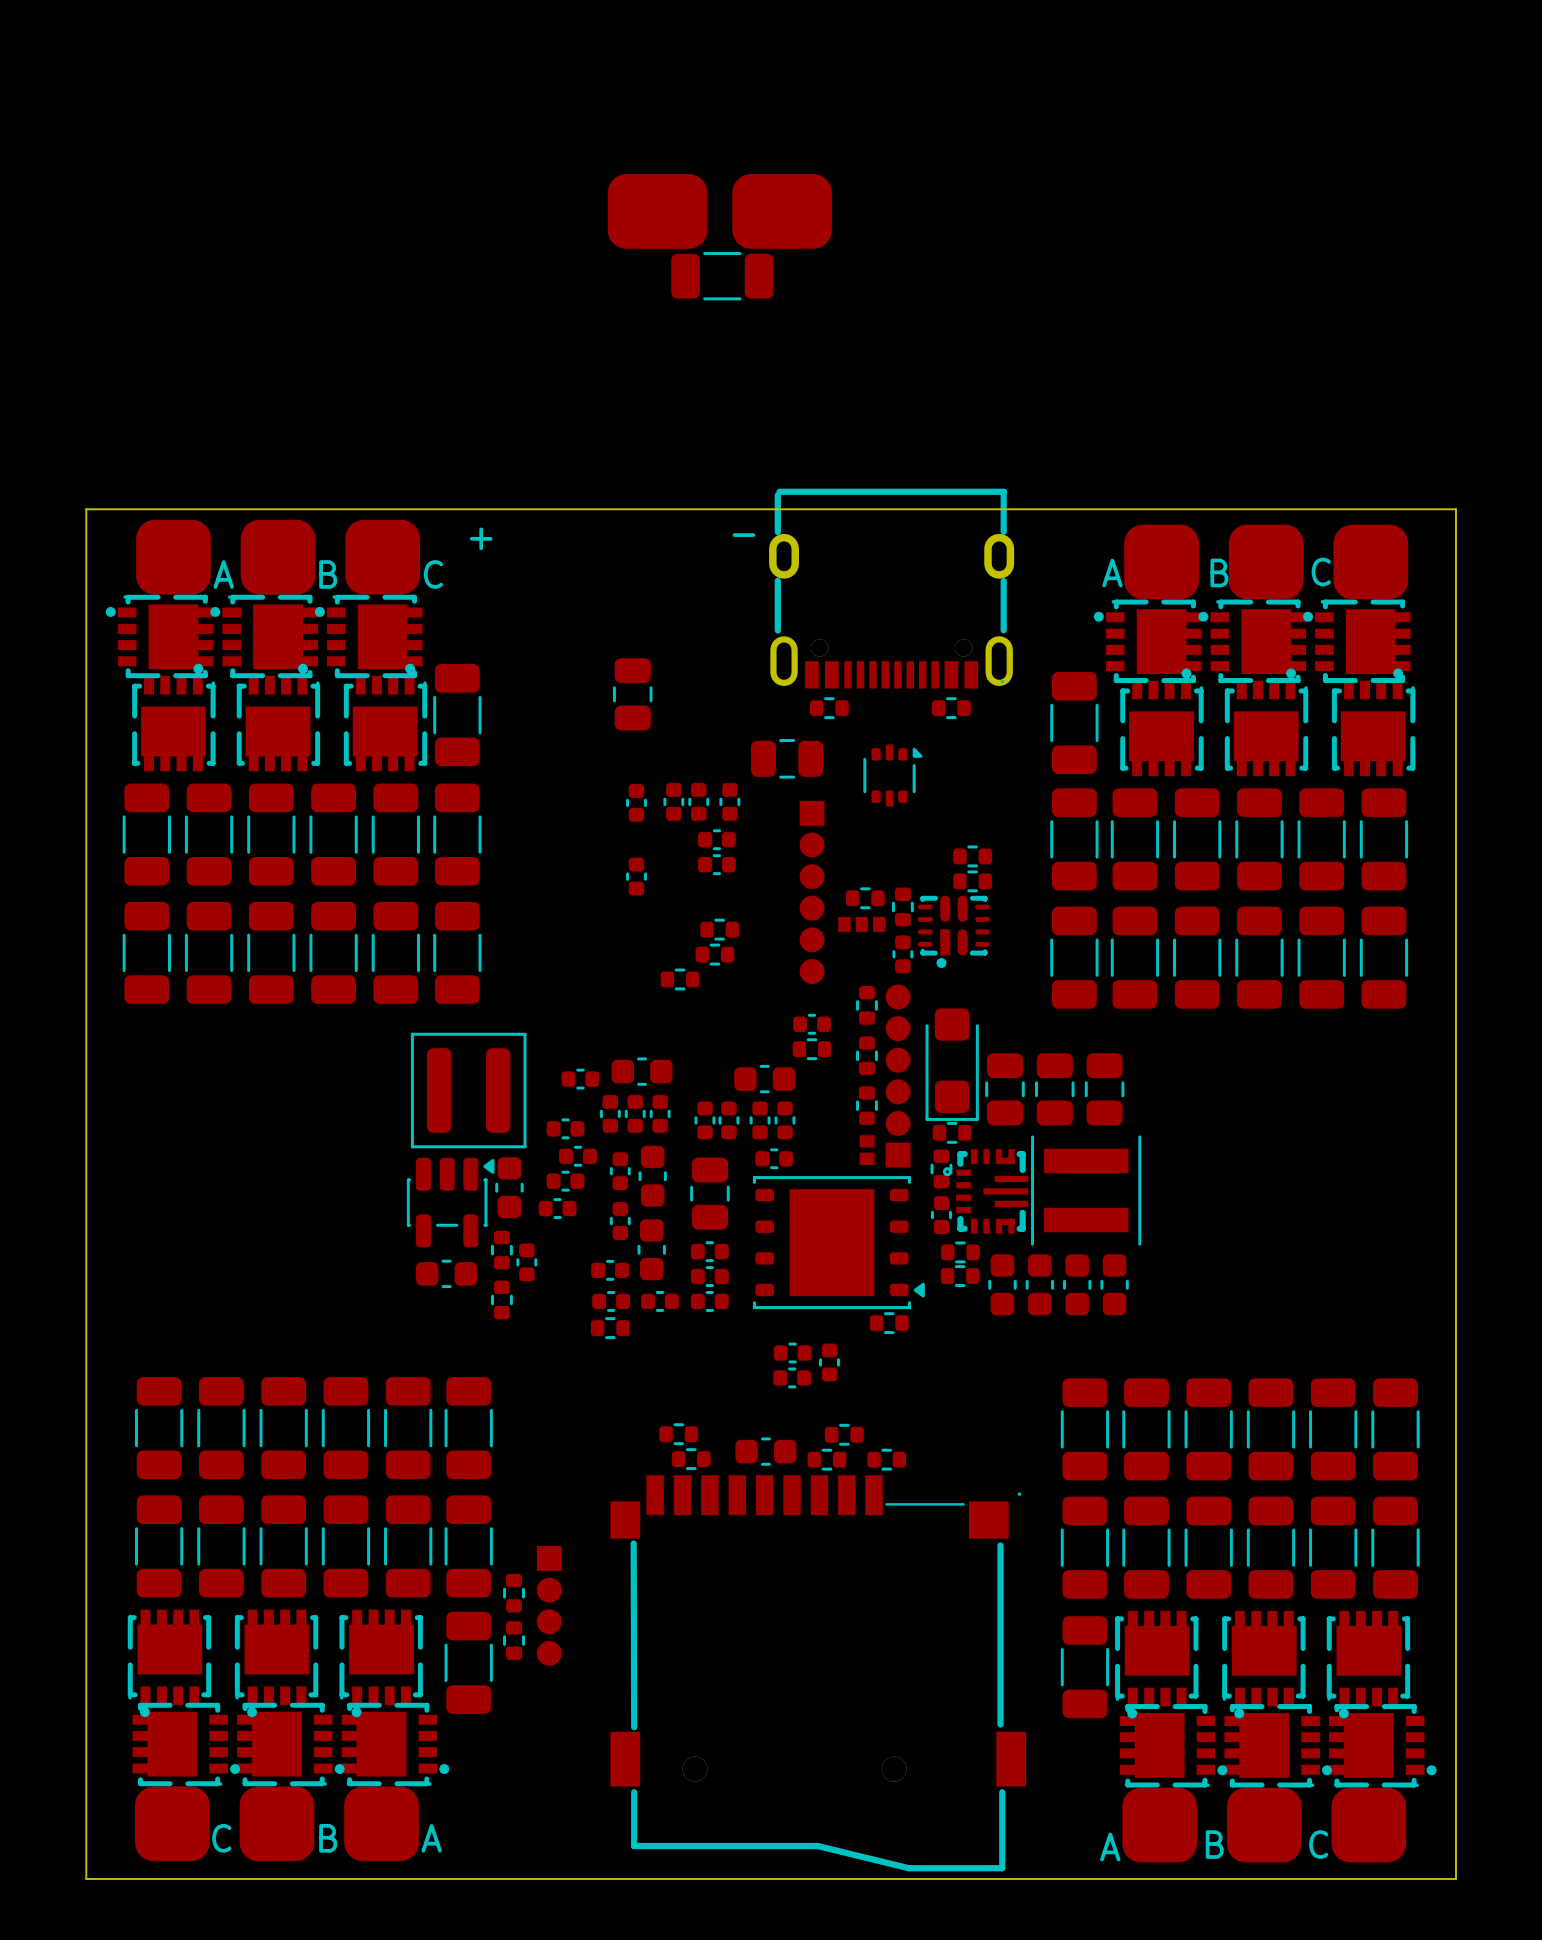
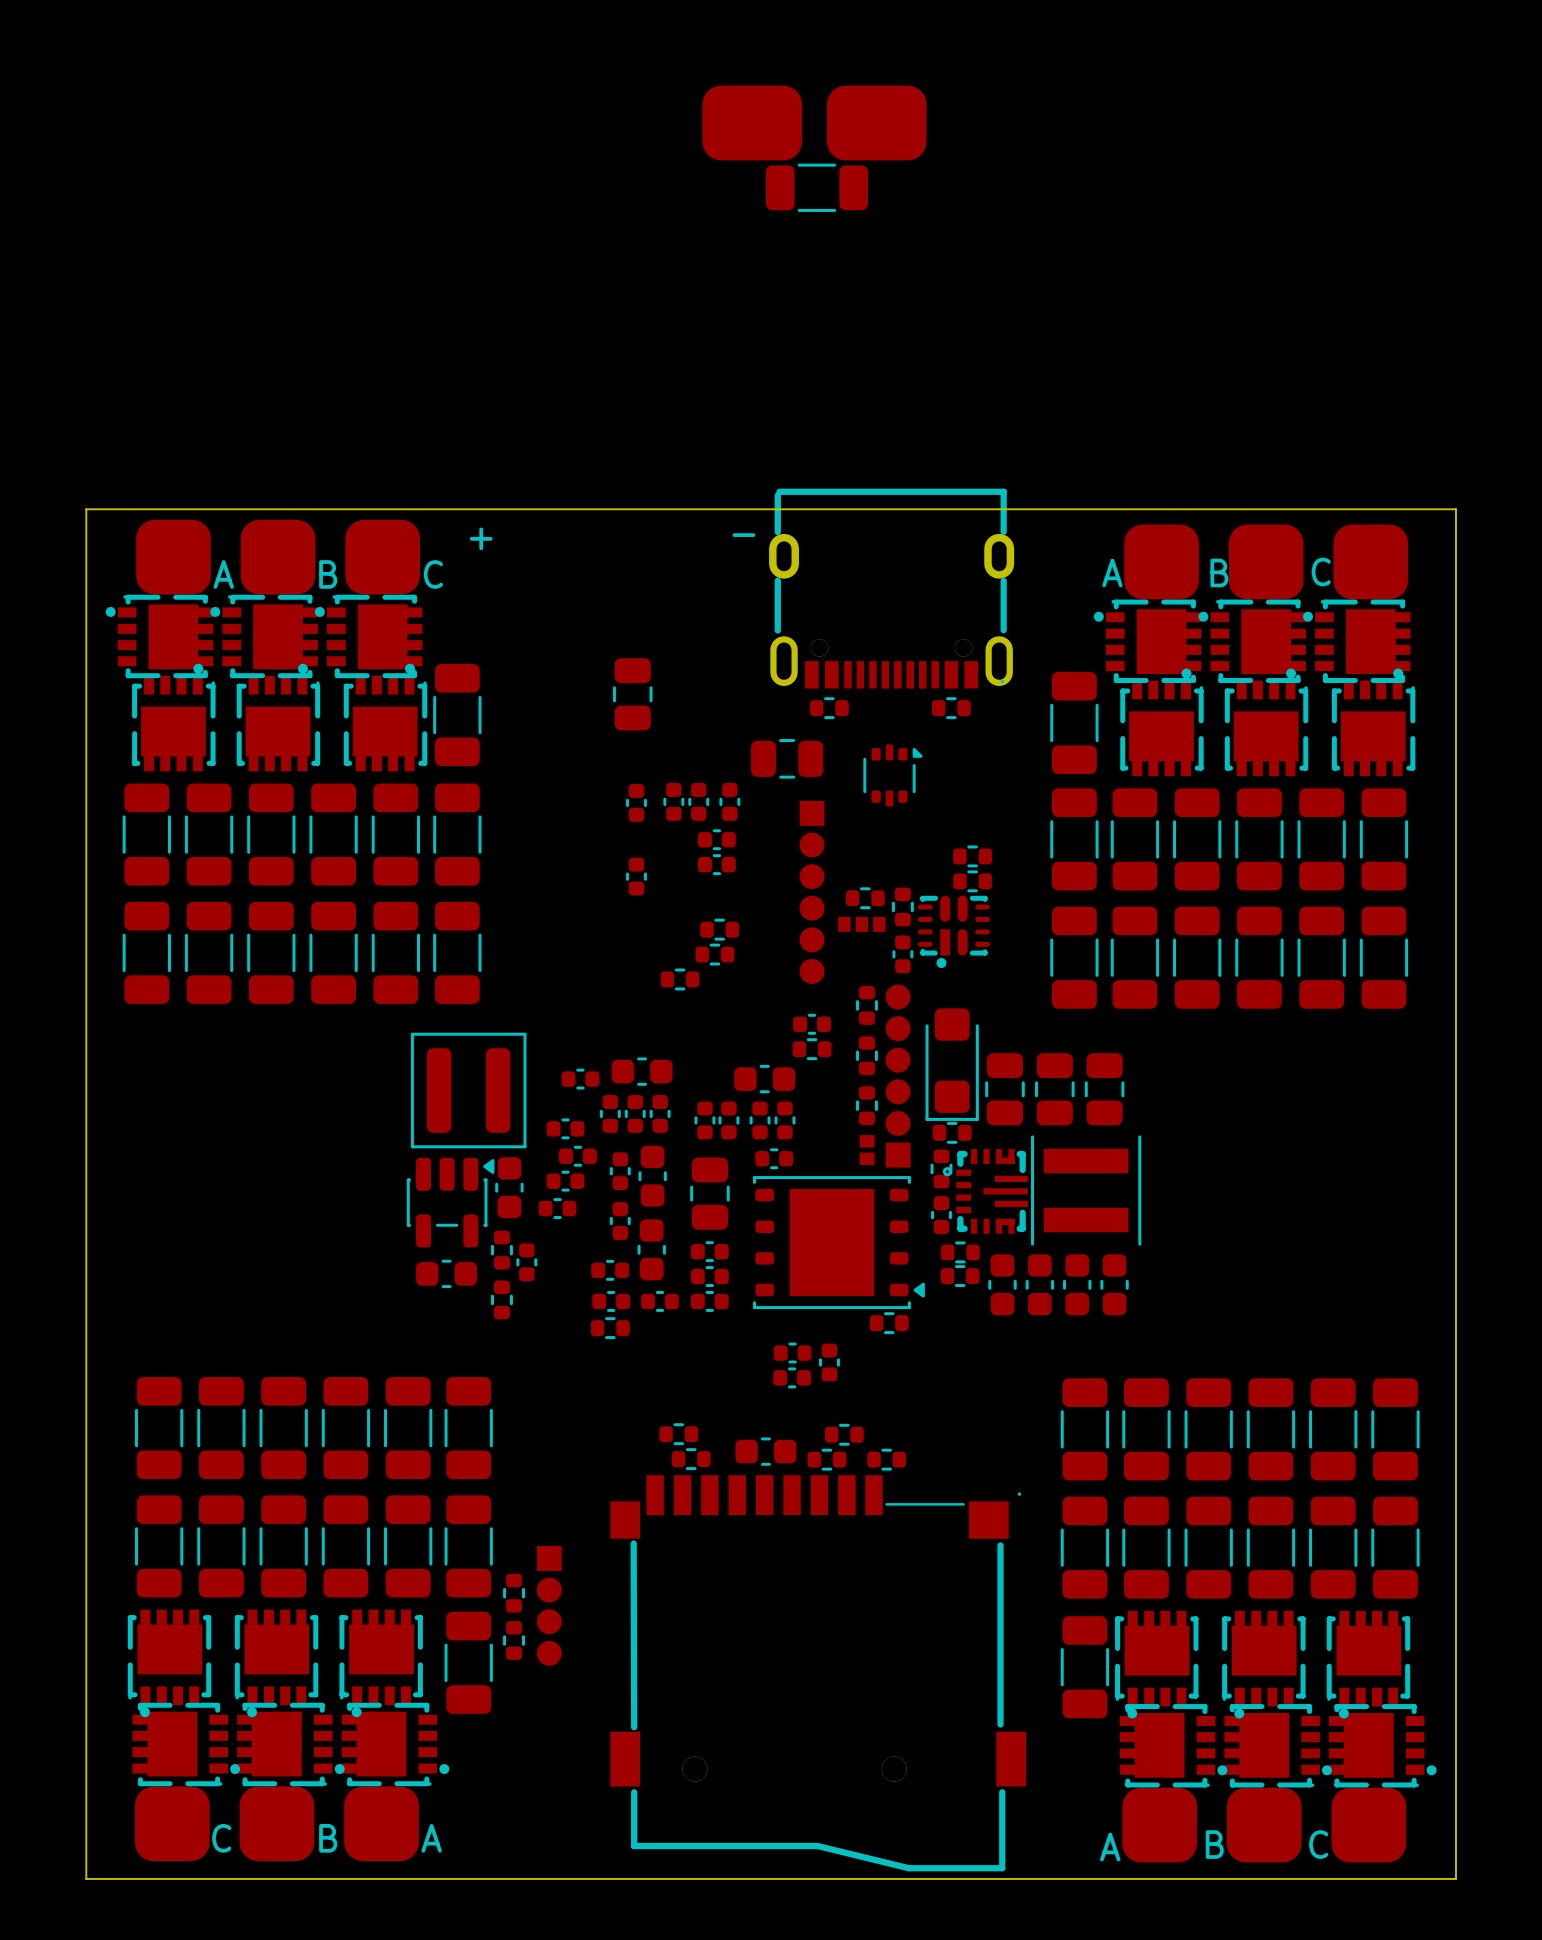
part: none -> (752, 123)
part: none -> (876, 123)
part: (657, 211) -> none
part: (782, 211) -> none
part position: (722, 276) -> (816, 187)

